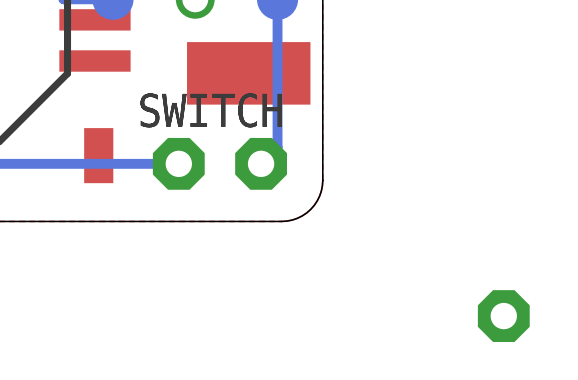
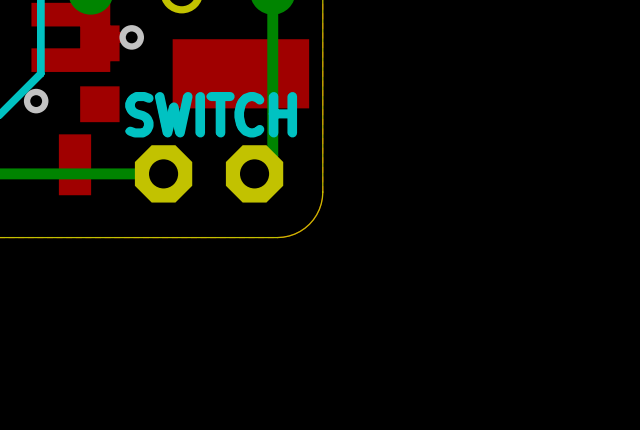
via: none -> (131, 37)
part: none -> (99, 73)
via: none -> (36, 101)
part: (503, 316) -> none

